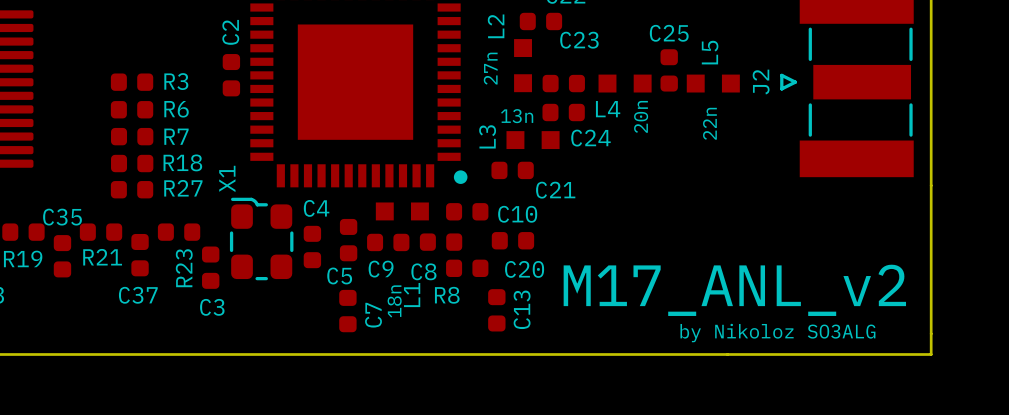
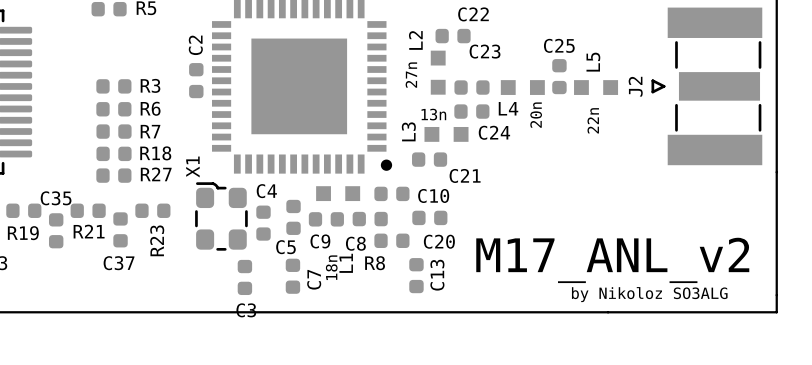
C3 position: (210, 267) -> (244, 277)

